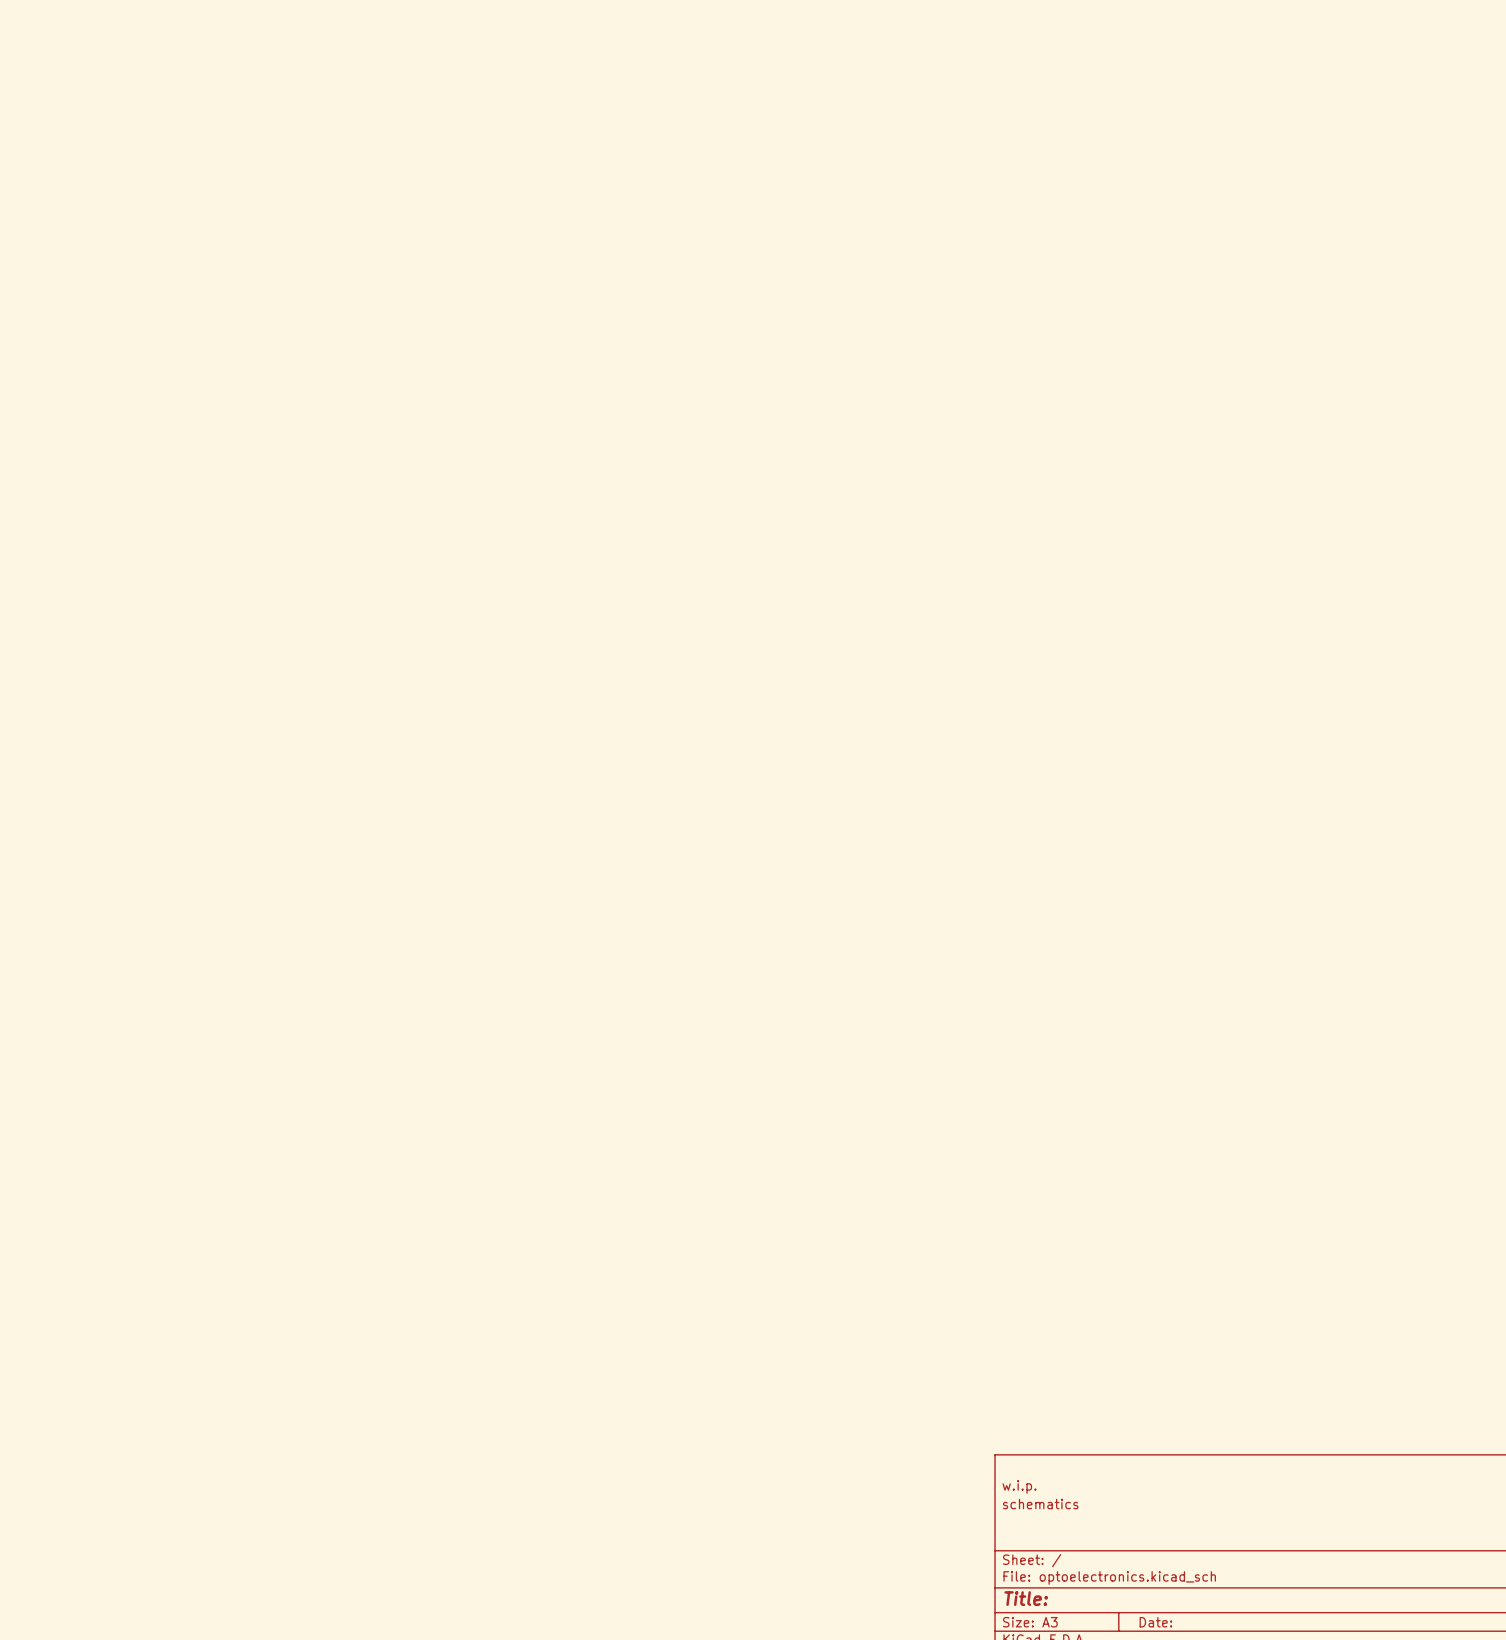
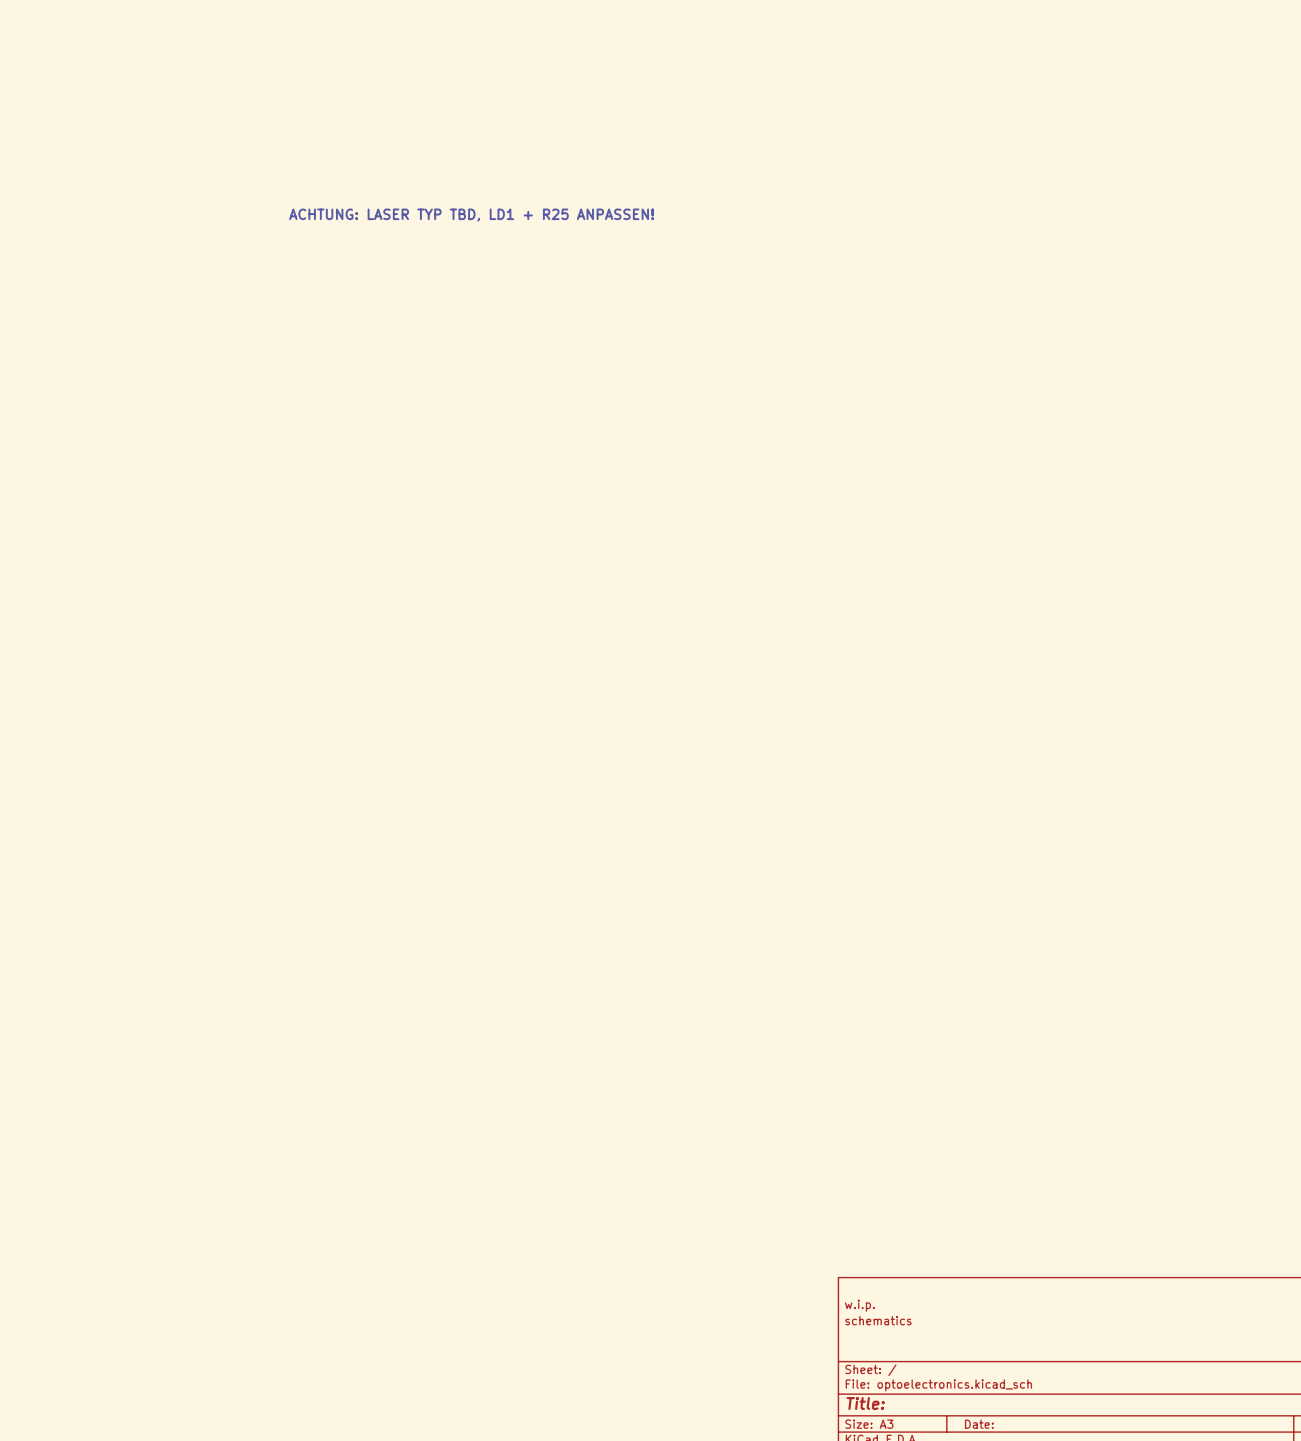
text: none -> ACHTUNG: LASER TYP TBD, LD1 + R25 ANPASSEN! (471, 215)

